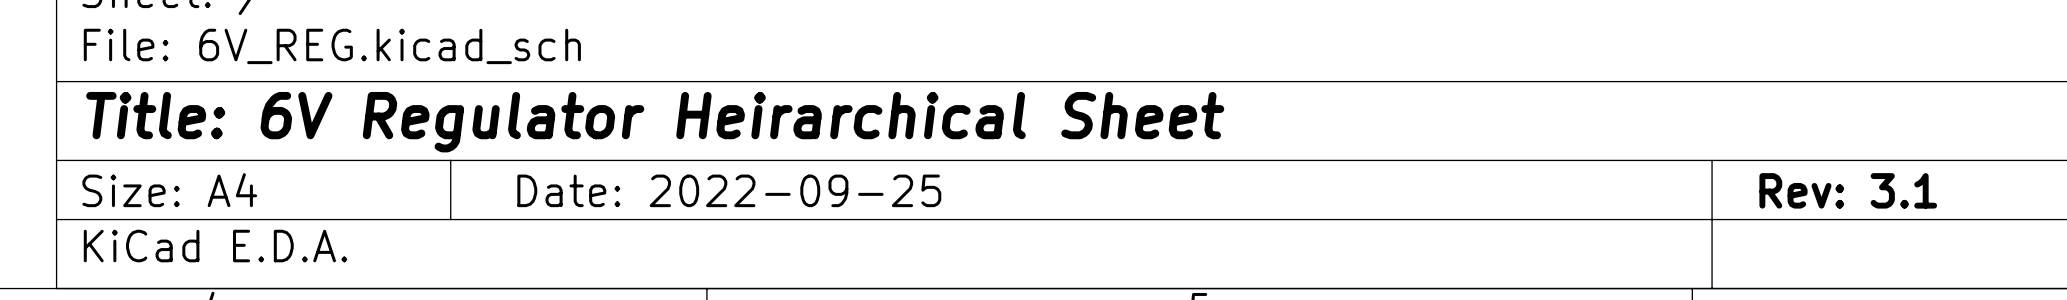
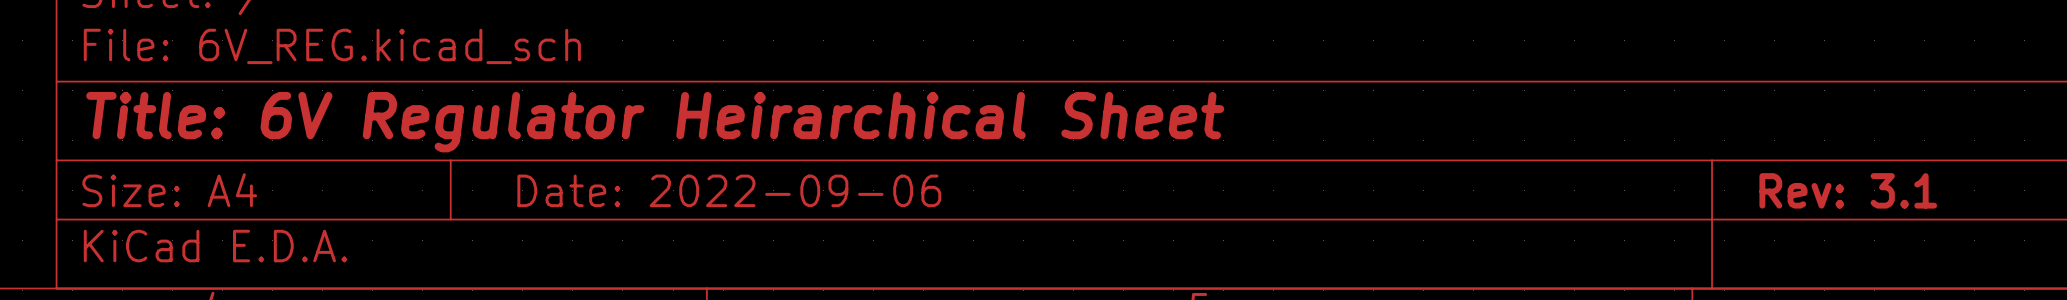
title block: Date: 2022-09-25 (729, 190) -> Date: 2022-09-06 (729, 190)

